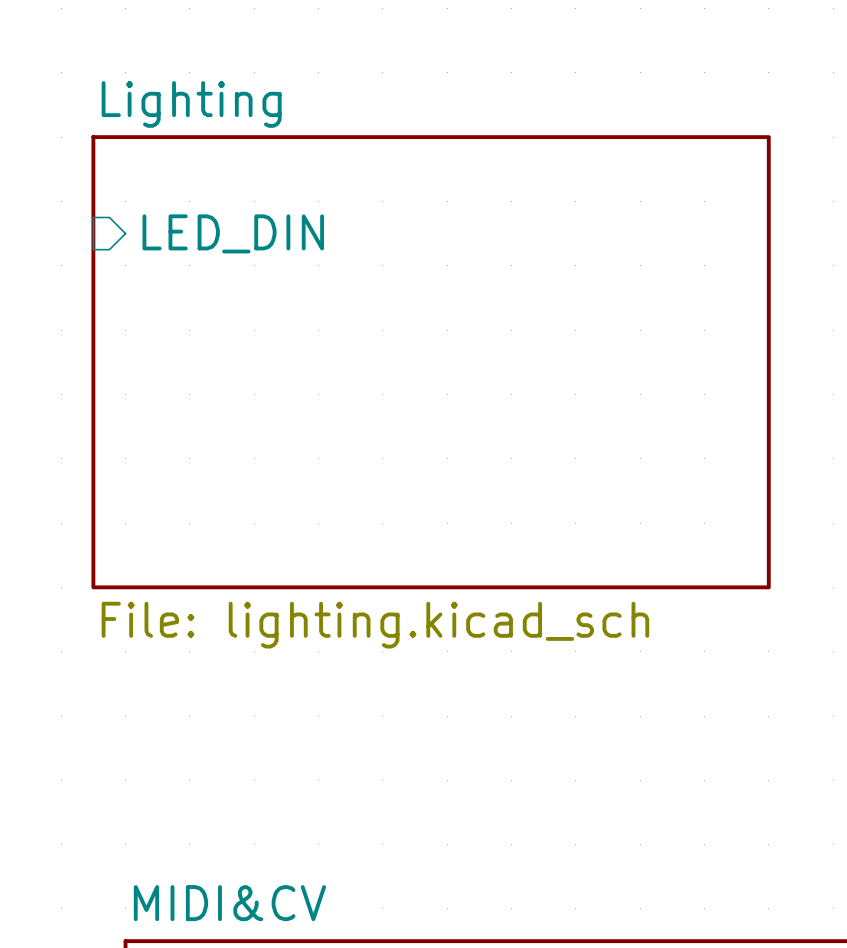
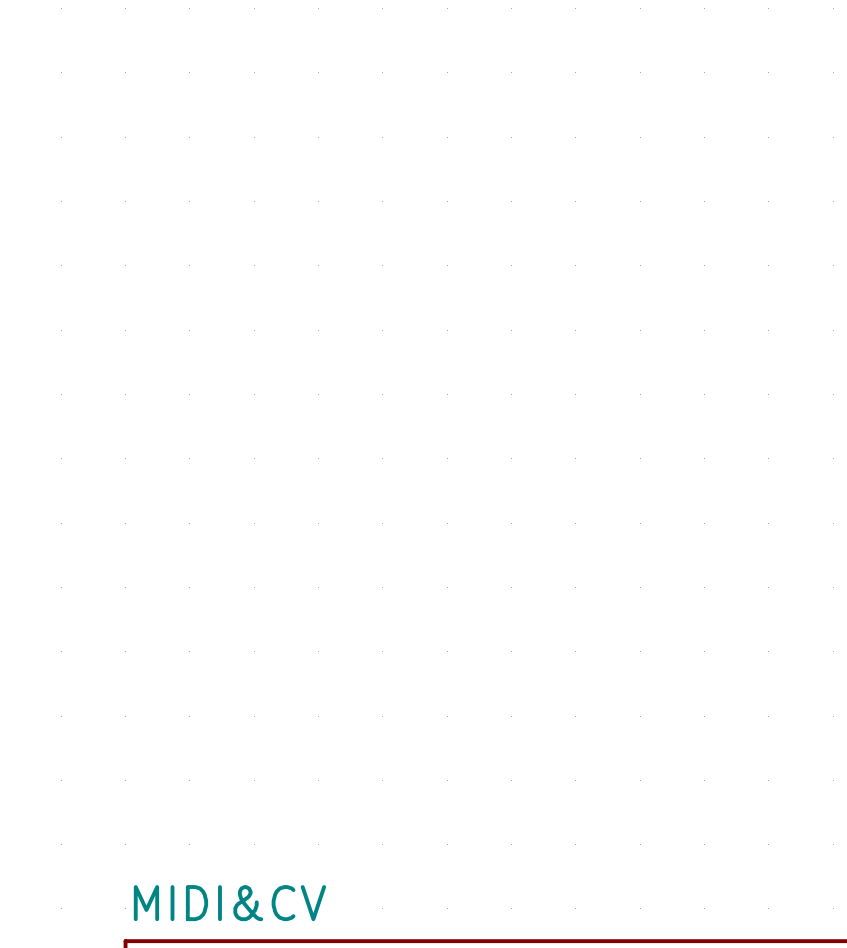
sheet pin: LED_DIN (233, 233) -> none
sheet Lighting: File: lighting.kicad_sch (431, 362) -> none

